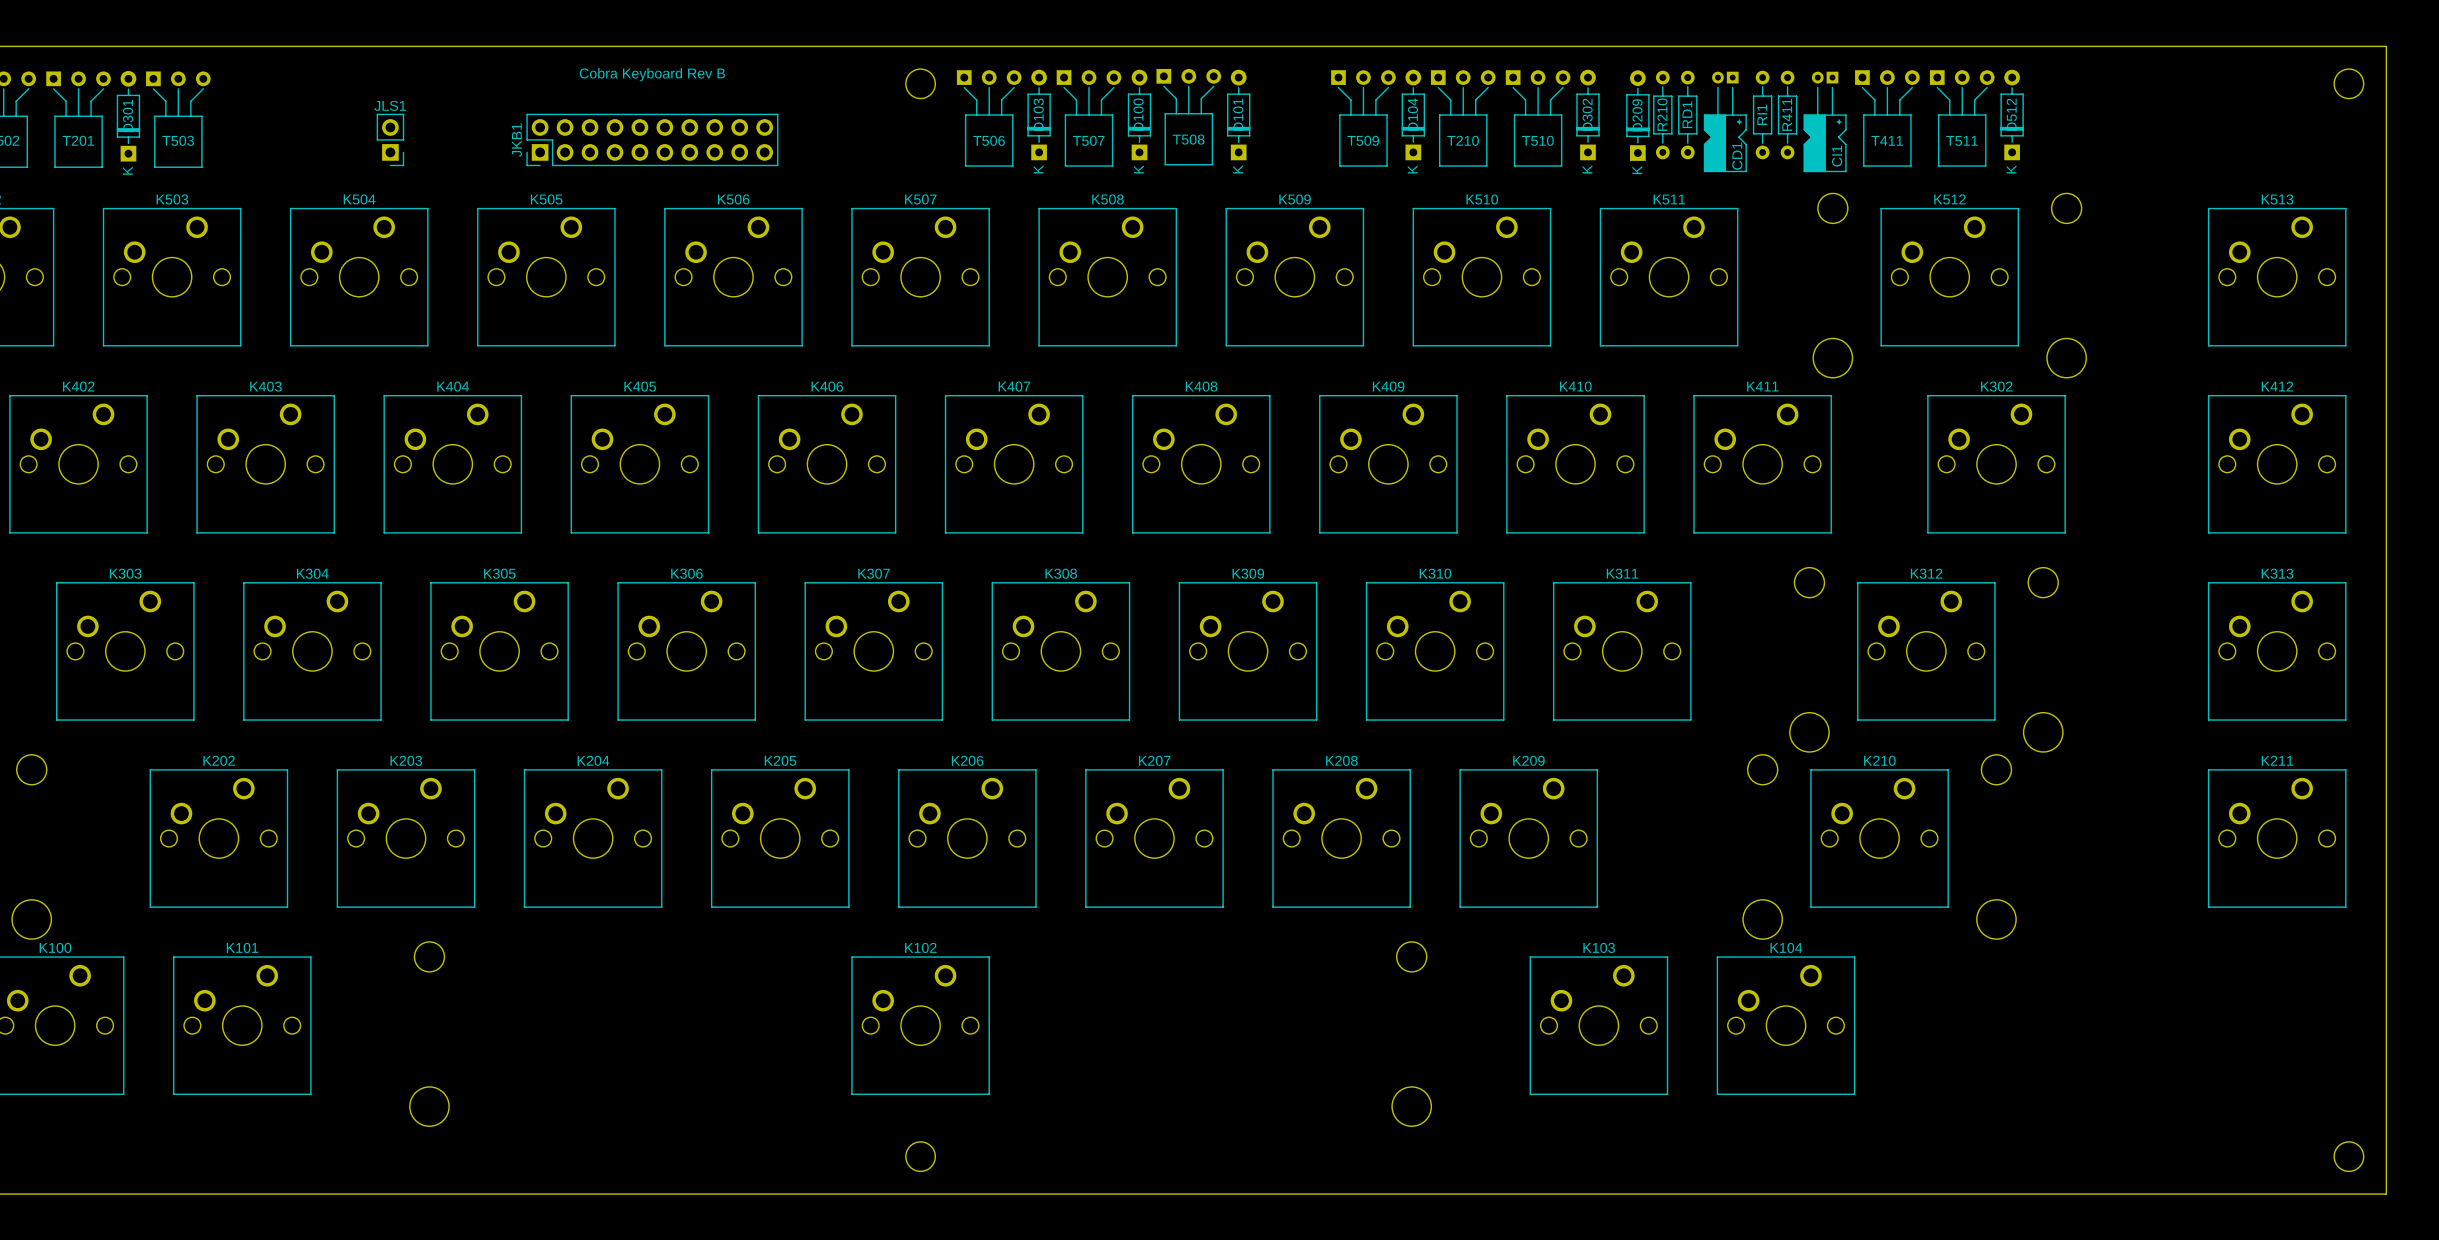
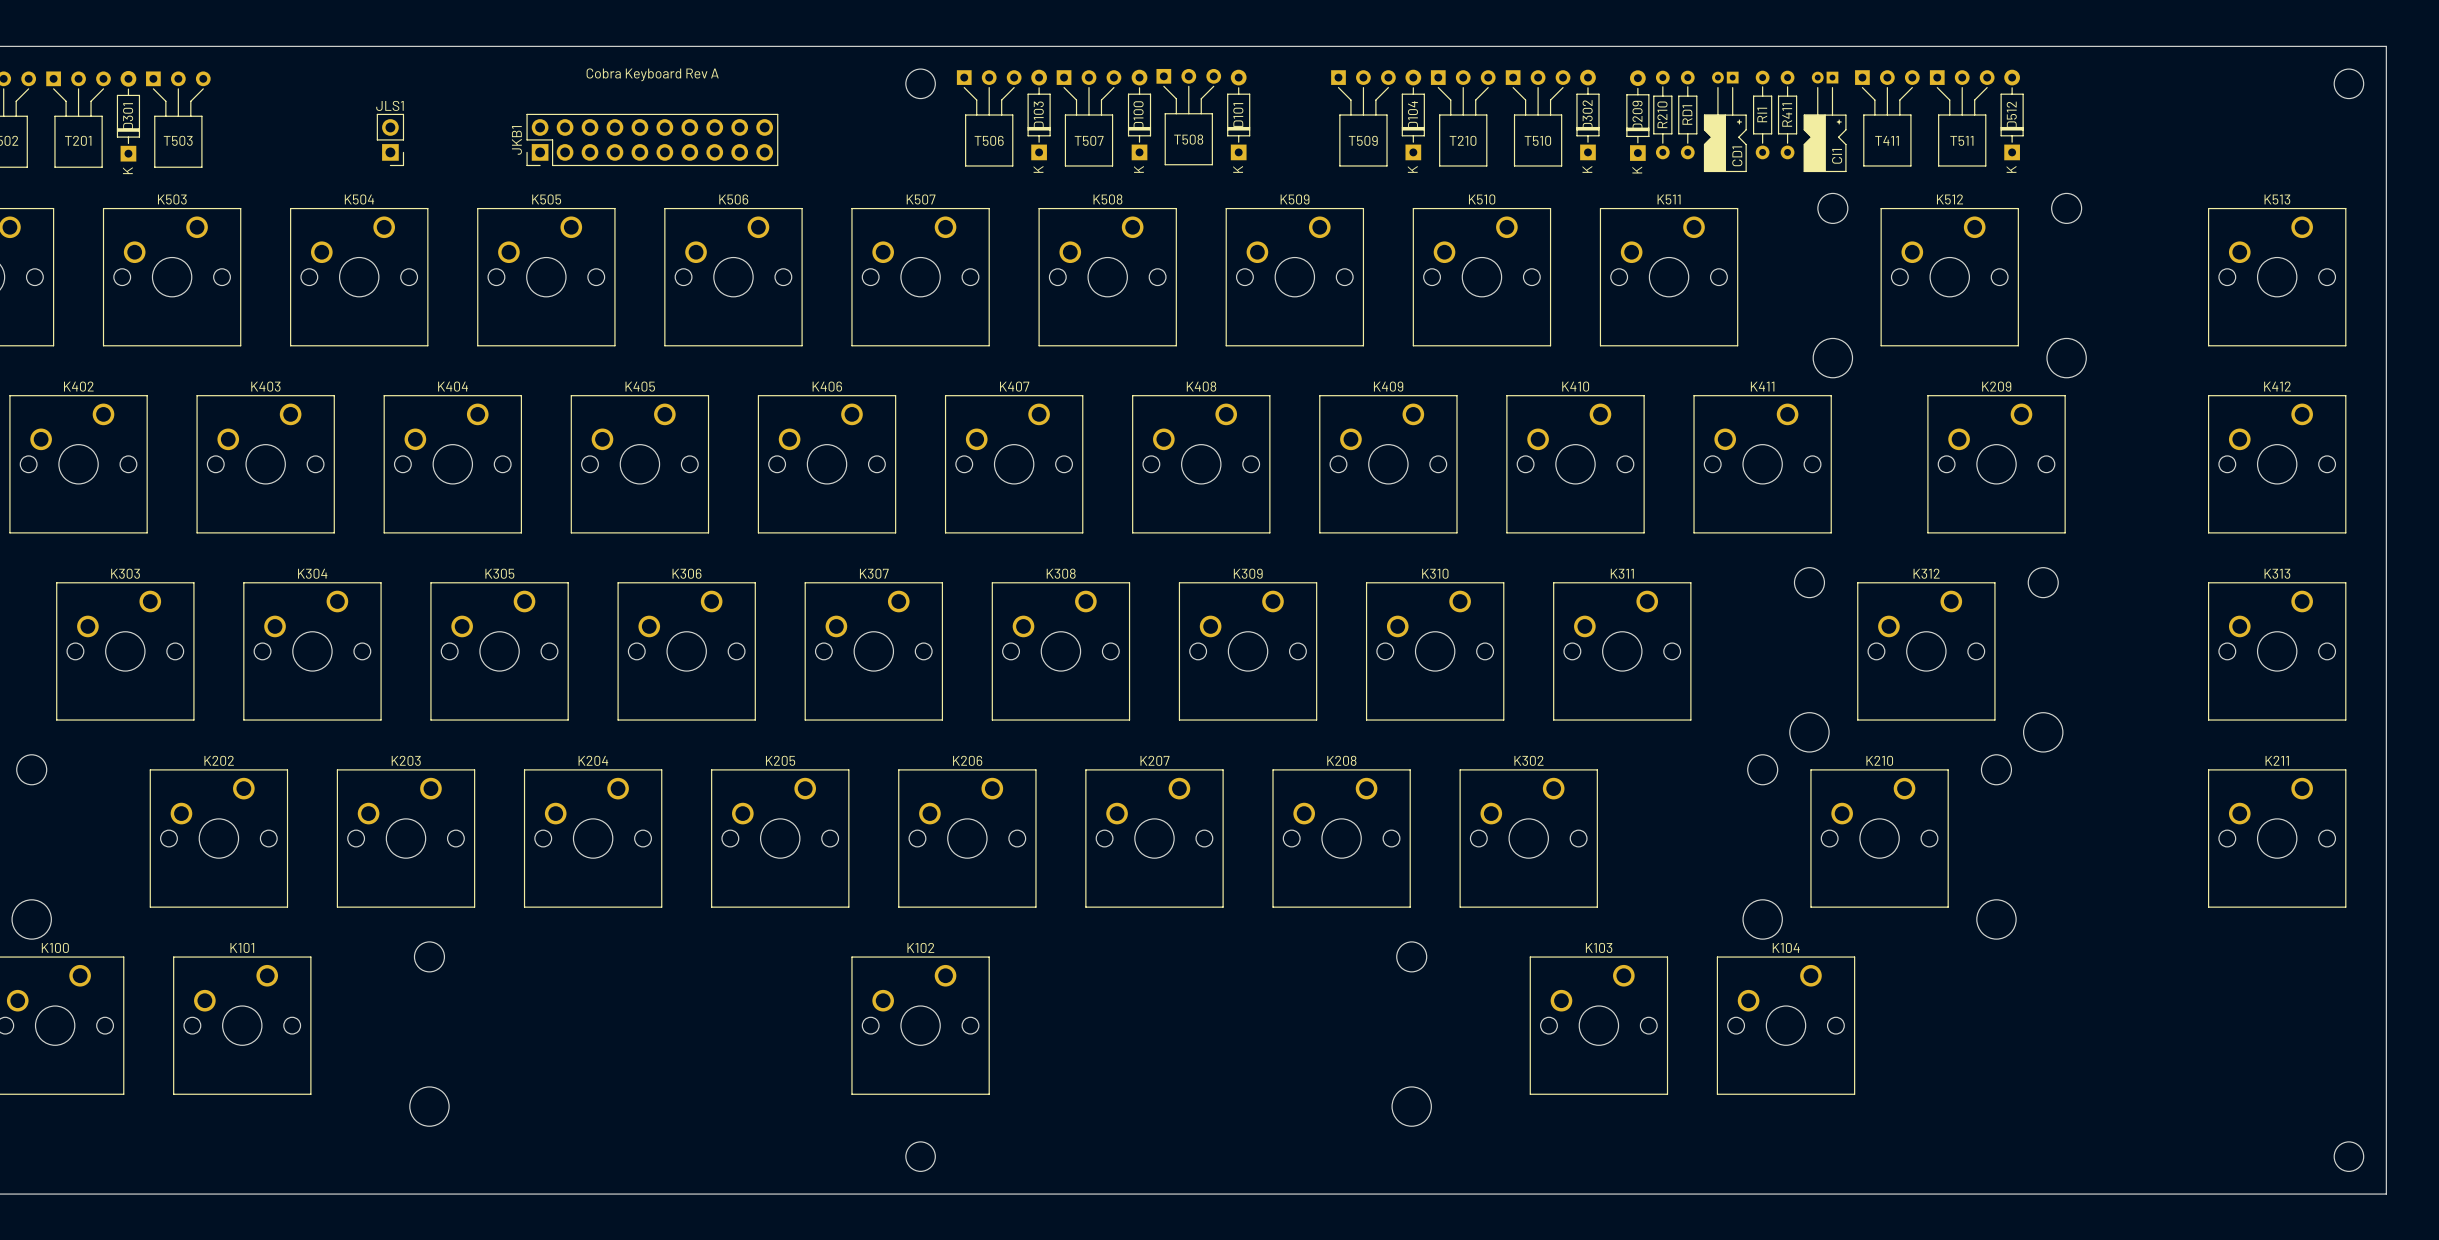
text: Cobra Keyboard Rev B (652, 74) -> Cobra Keyboard Rev A (652, 74)
K302 name: K302 (1996, 386) -> K209 (1996, 386)
K209 name: K209 (1528, 760) -> K302 (1528, 760)

